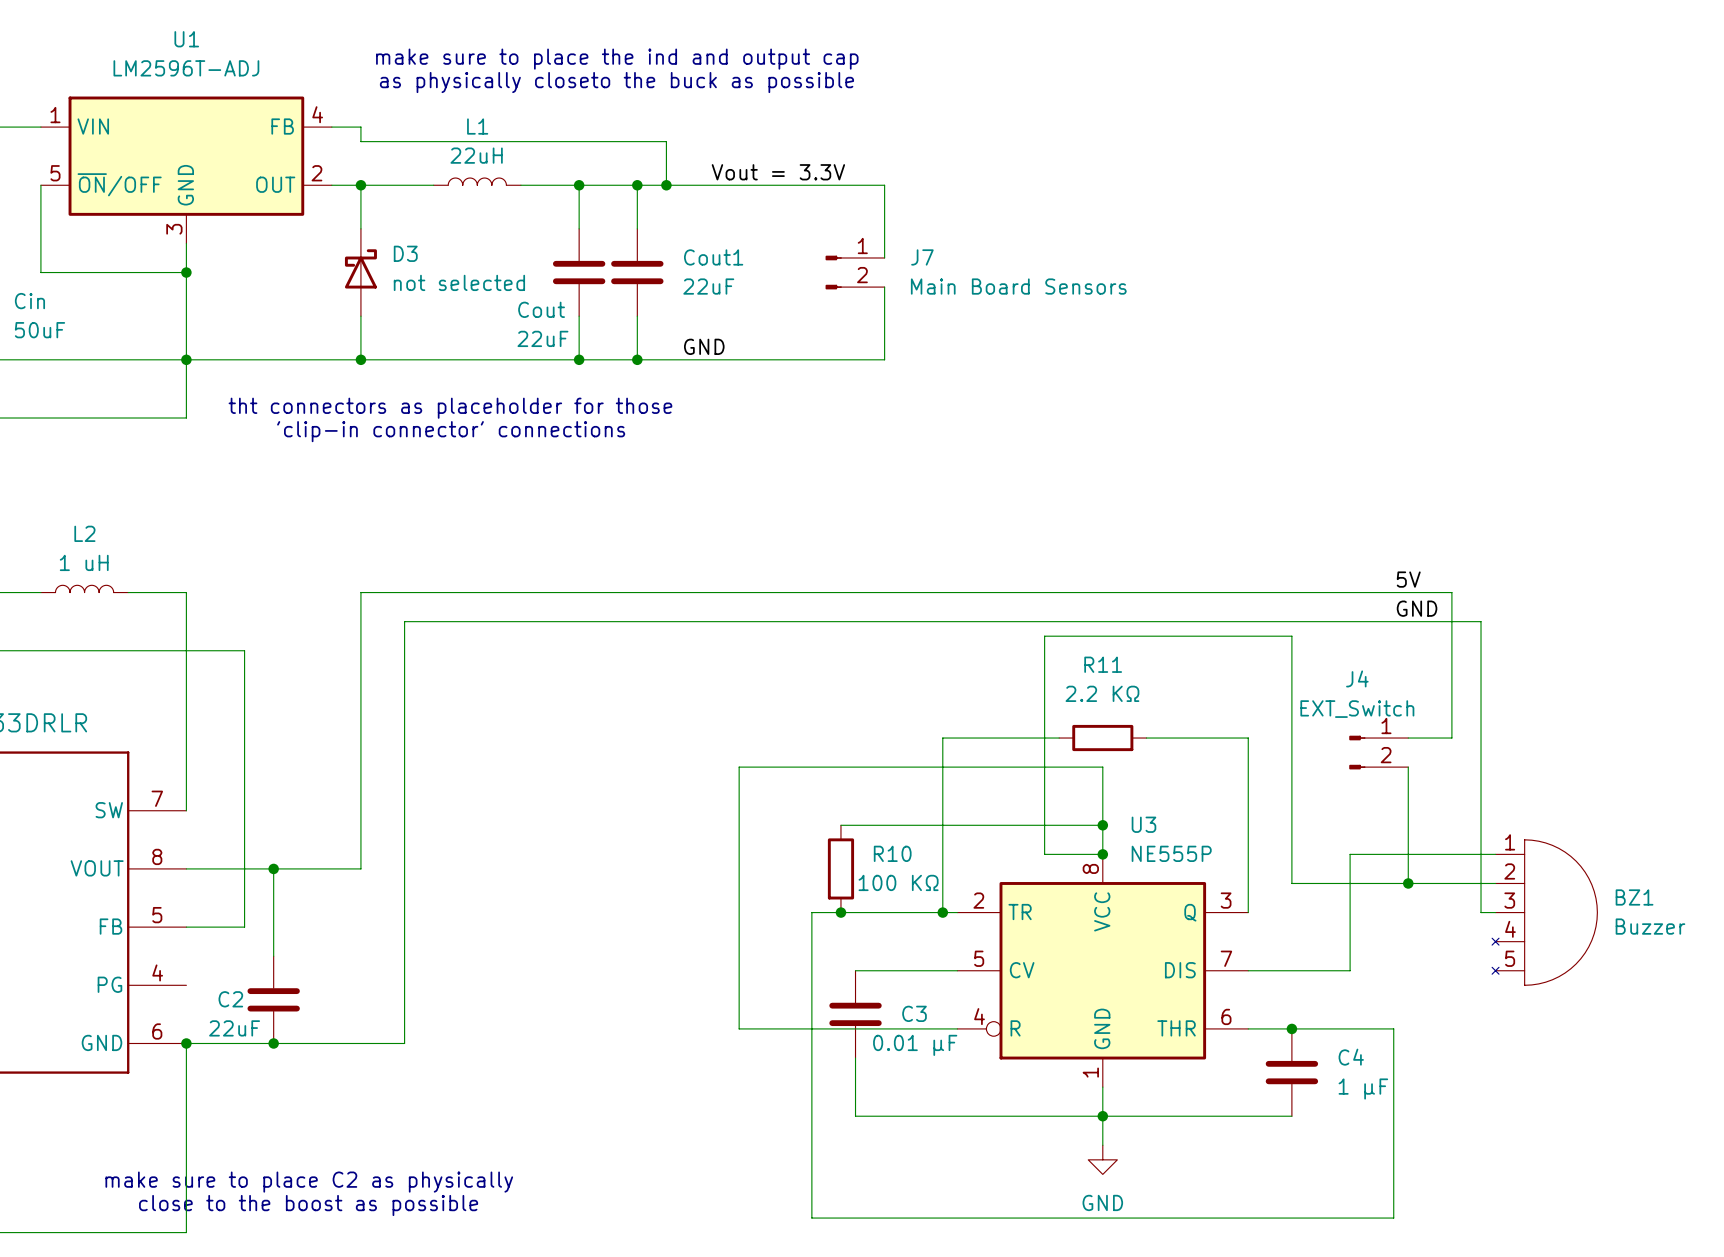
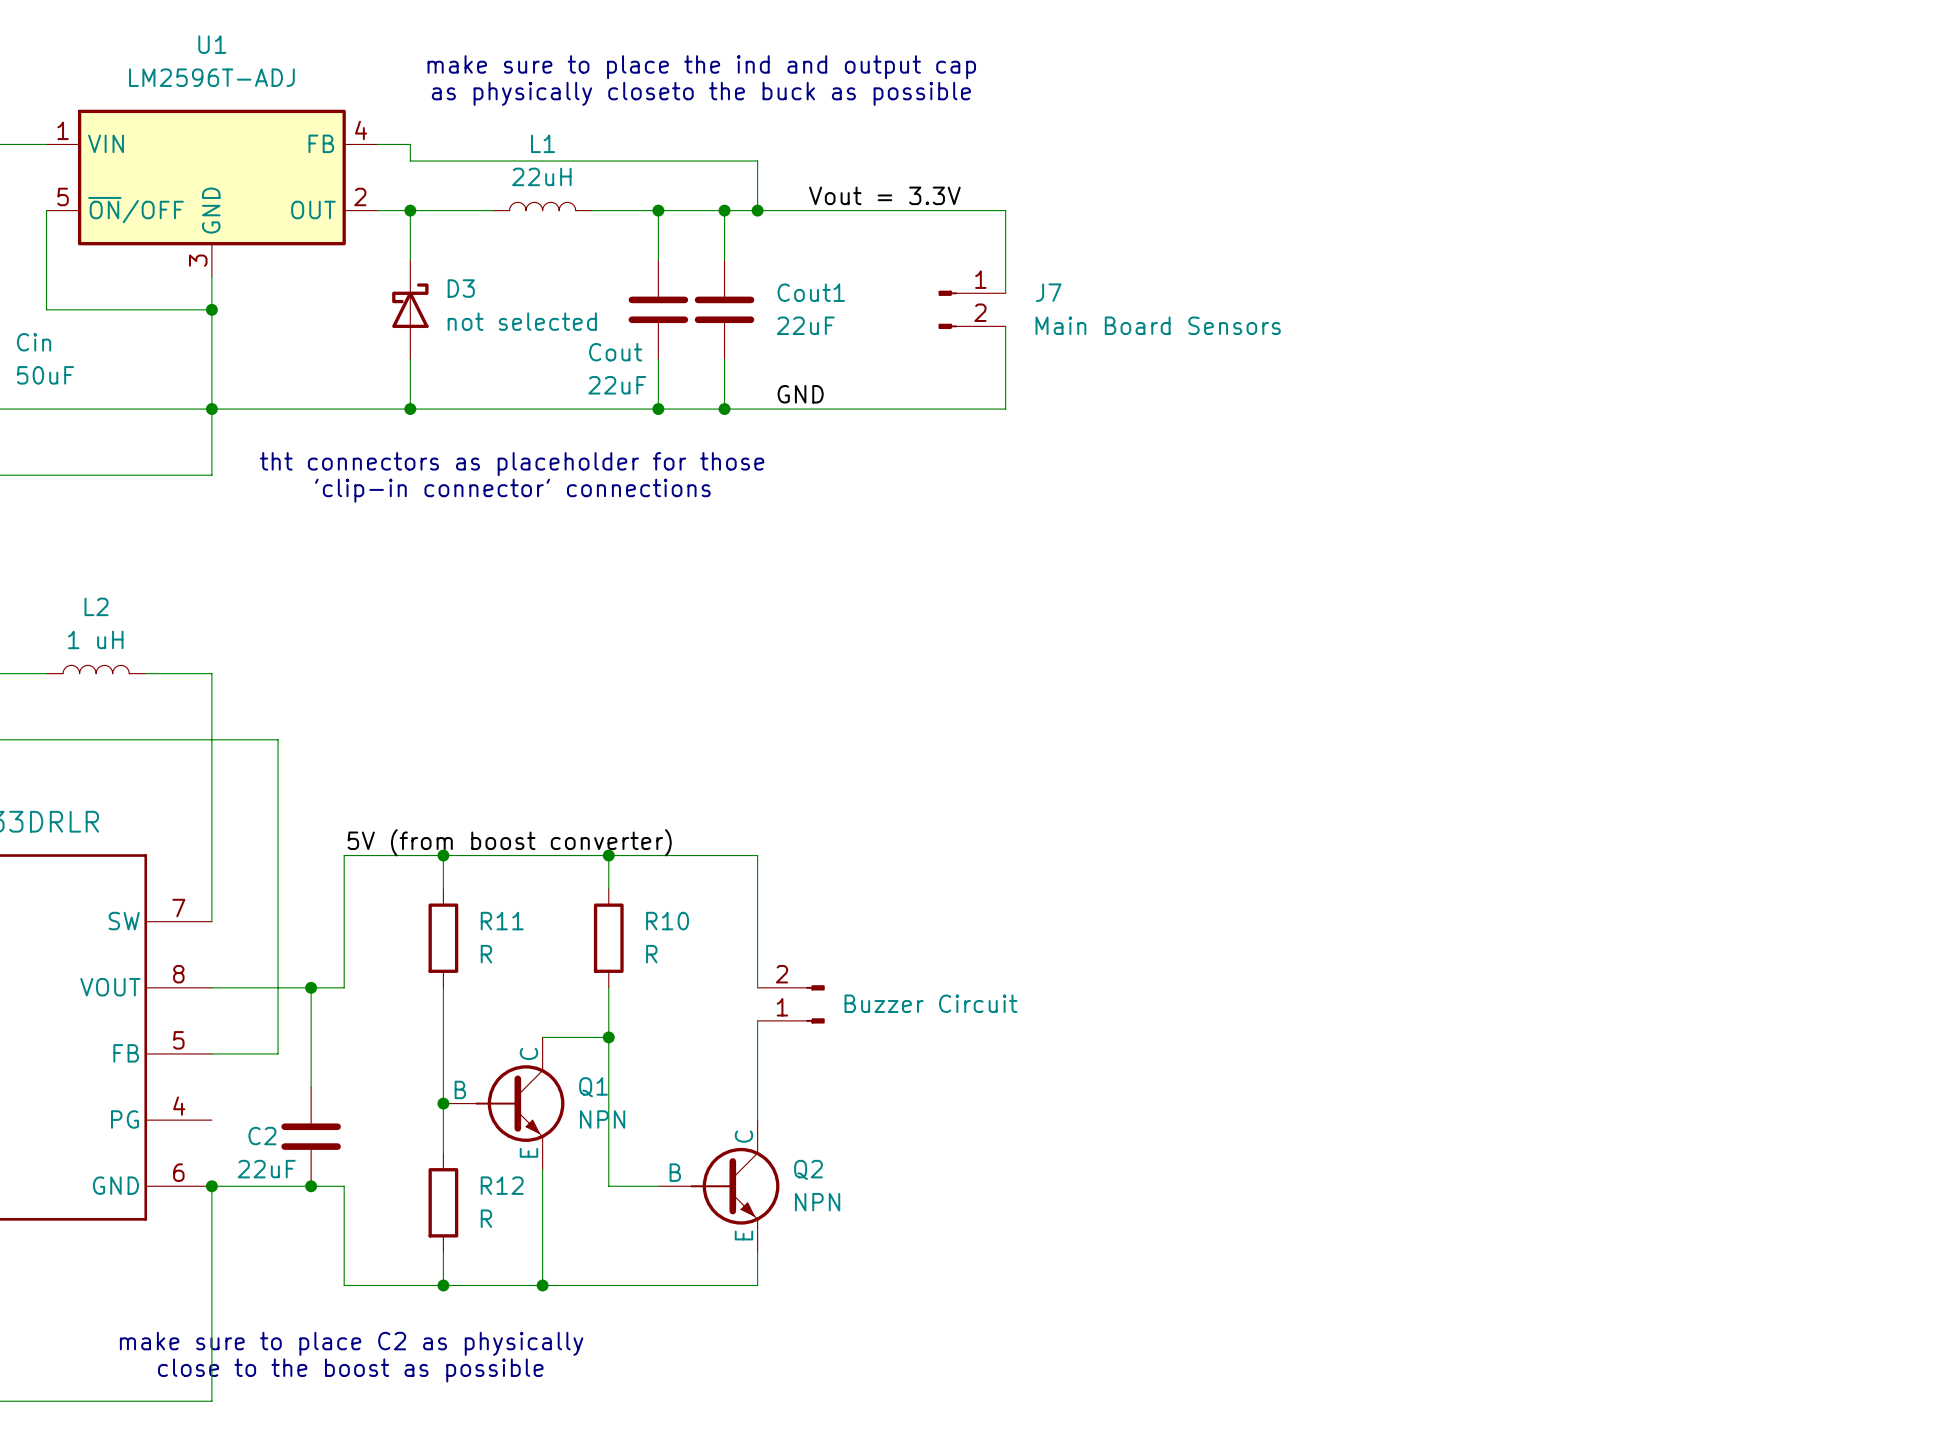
label: 5V (1408, 579) -> none
label: GND (1417, 608) -> none
R11 name position: R11 (1103, 664) -> R11 (502, 921)
R11 value: 2.2 KΩ (1102, 693) -> R (486, 954)
wire: (1059, 738) (942, 738) (942, 912) -> none
R11 rotation: 0° (1102, 738) -> 90° clockwise (443, 938)
R11 position: (1102, 738) -> (443, 938)
wire: (1146, 738) (1248, 738) (1248, 912) -> none
wire: (1408, 738) (1451, 738) (1451, 592) (360, 592) (360, 868) (302, 868) -> (757, 987) (757, 855) (344, 855) (344, 987)
label: none -> 5V (from boost converter) (509, 842)
wire: none -> (443, 855) (443, 888)
junction: none -> (443, 855)
wire: none -> (608, 855) (608, 888)
junction: none -> (608, 855)
J4: EXT_Switch (1378, 752) -> none
wire: (1408, 767) (1408, 883) -> none
wire: (840, 825) (1102, 825) -> none
junction: (1102, 825) -> none
junction: (1102, 854) -> none
wire: (1495, 854) (1350, 854) (1350, 970) (1248, 970) -> none
wire: none -> (443, 987) (443, 1153)
wire: none -> (608, 987) (608, 1186) (658, 1186)
R10 position: (840, 868) -> (608, 938)
R10 value: 100 KΩ (898, 882) -> R (651, 954)
part: none -> Buzzer Circuit (791, 1004)
junction: (1408, 883) -> none
wire: (1495, 883) (1291, 883) (1291, 636) (1044, 636) (1044, 854) (1102, 854) (1102, 767) (739, 767) (739, 1028) (957, 1028) -> none
wire: none -> (757, 1020) (757, 1120)
wire: none -> (542, 1037) (608, 1037)
junction: none -> (608, 1037)
junction: (840, 912) -> none
junction: (942, 912) -> none
wire: (957, 912) (811, 912) (811, 1218) (1393, 1218) (1393, 1028) (1248, 1028) -> none
wire: (1495, 912) (1481, 912) (1481, 621) (404, 621) (404, 1043) (302, 1043) -> (757, 1252) (757, 1285) (344, 1285) (344, 1186)
BZ1: Buzzer (1544, 912) -> none
junction: none -> (443, 1103)
Q1: none -> NPN (503, 1103)
wire: (855, 970) (957, 970) -> none
U3: NE555P (1102, 970) -> none
C3: 0.01 μF (855, 1014) -> none
wire: none -> (542, 1169) (542, 1285)
junction: (1291, 1028) -> none
Q2: none -> NPN (718, 1186)
R12: none -> R (443, 1202)
wire: (855, 1058) (855, 1116) (1291, 1116) -> none
C4: 1 μF (1291, 1072) -> none
wire: (1102, 1087) (1102, 1145) -> none
wire: none -> (443, 1252) (443, 1285)
junction: (1102, 1116) -> none
junction: none -> (443, 1285)
junction: none -> (542, 1285)
power symbol: GND (1102, 1159) -> none

